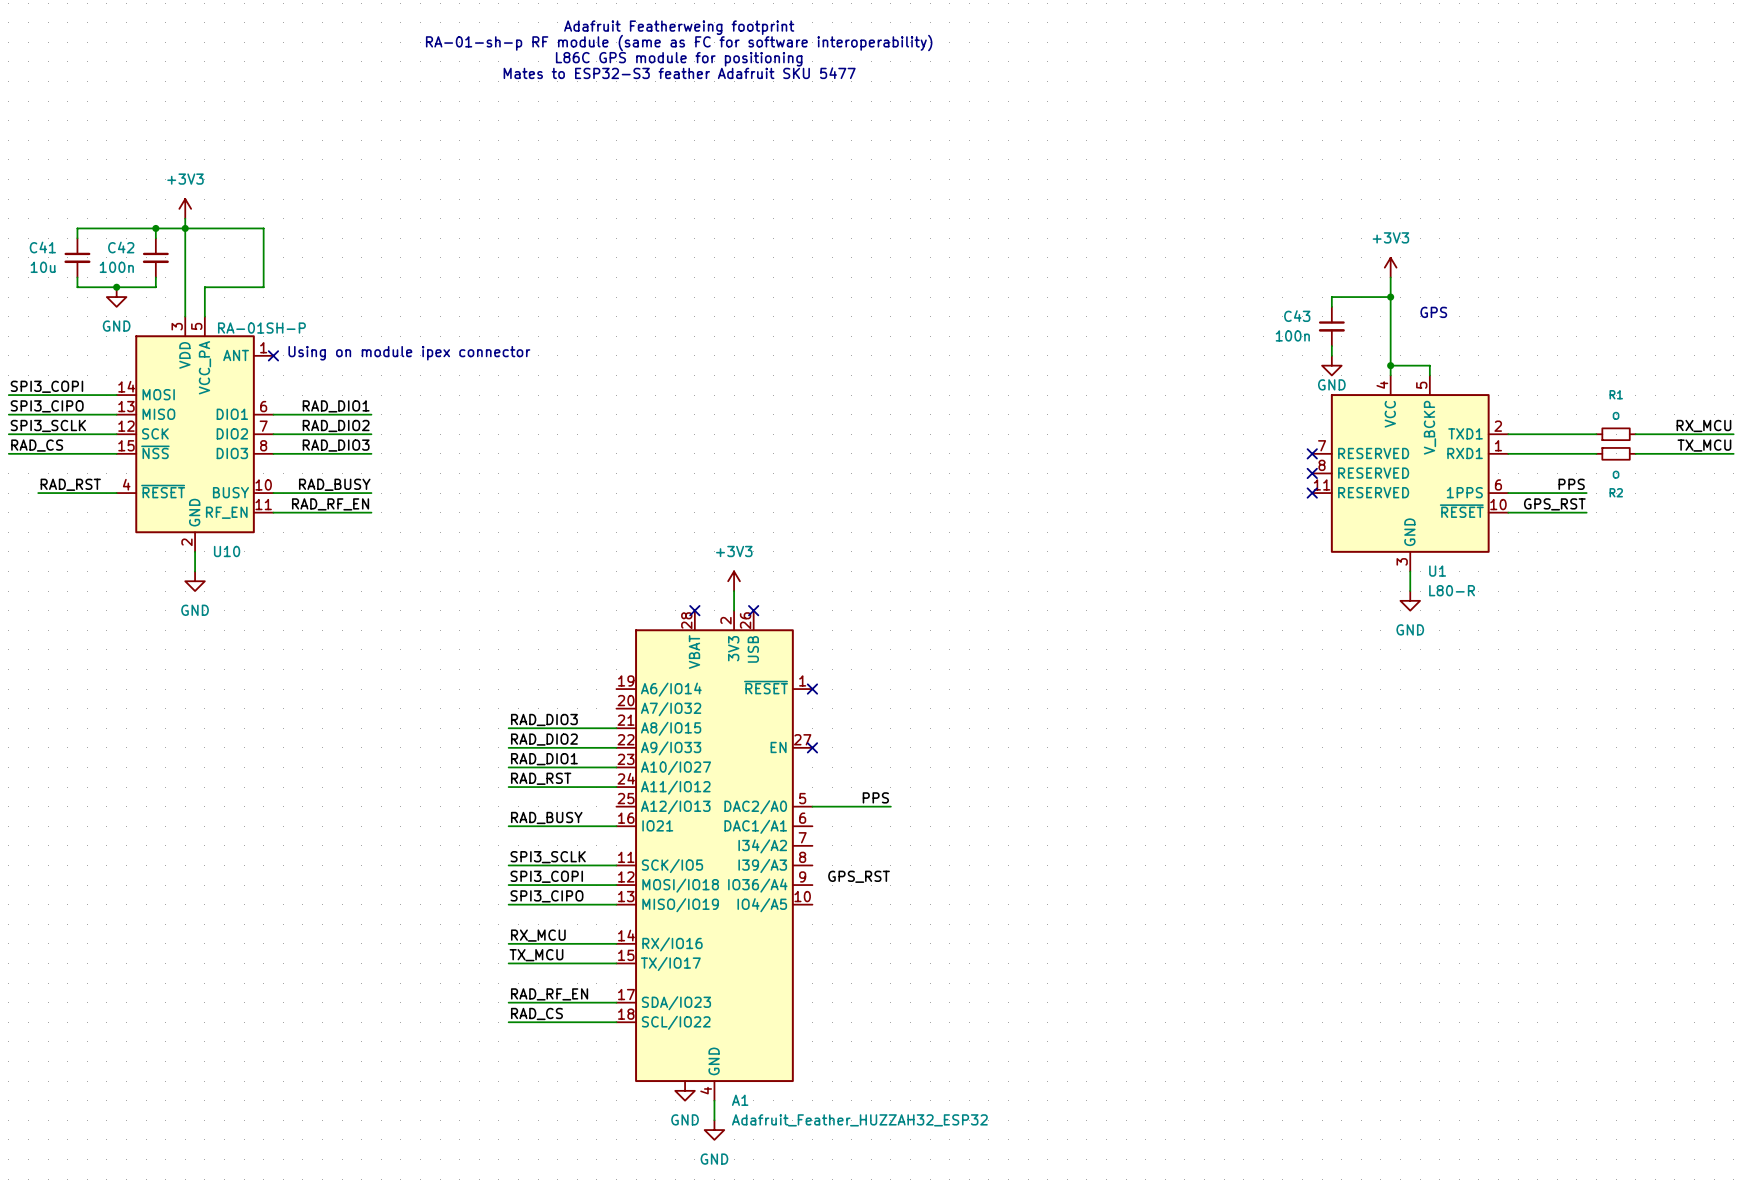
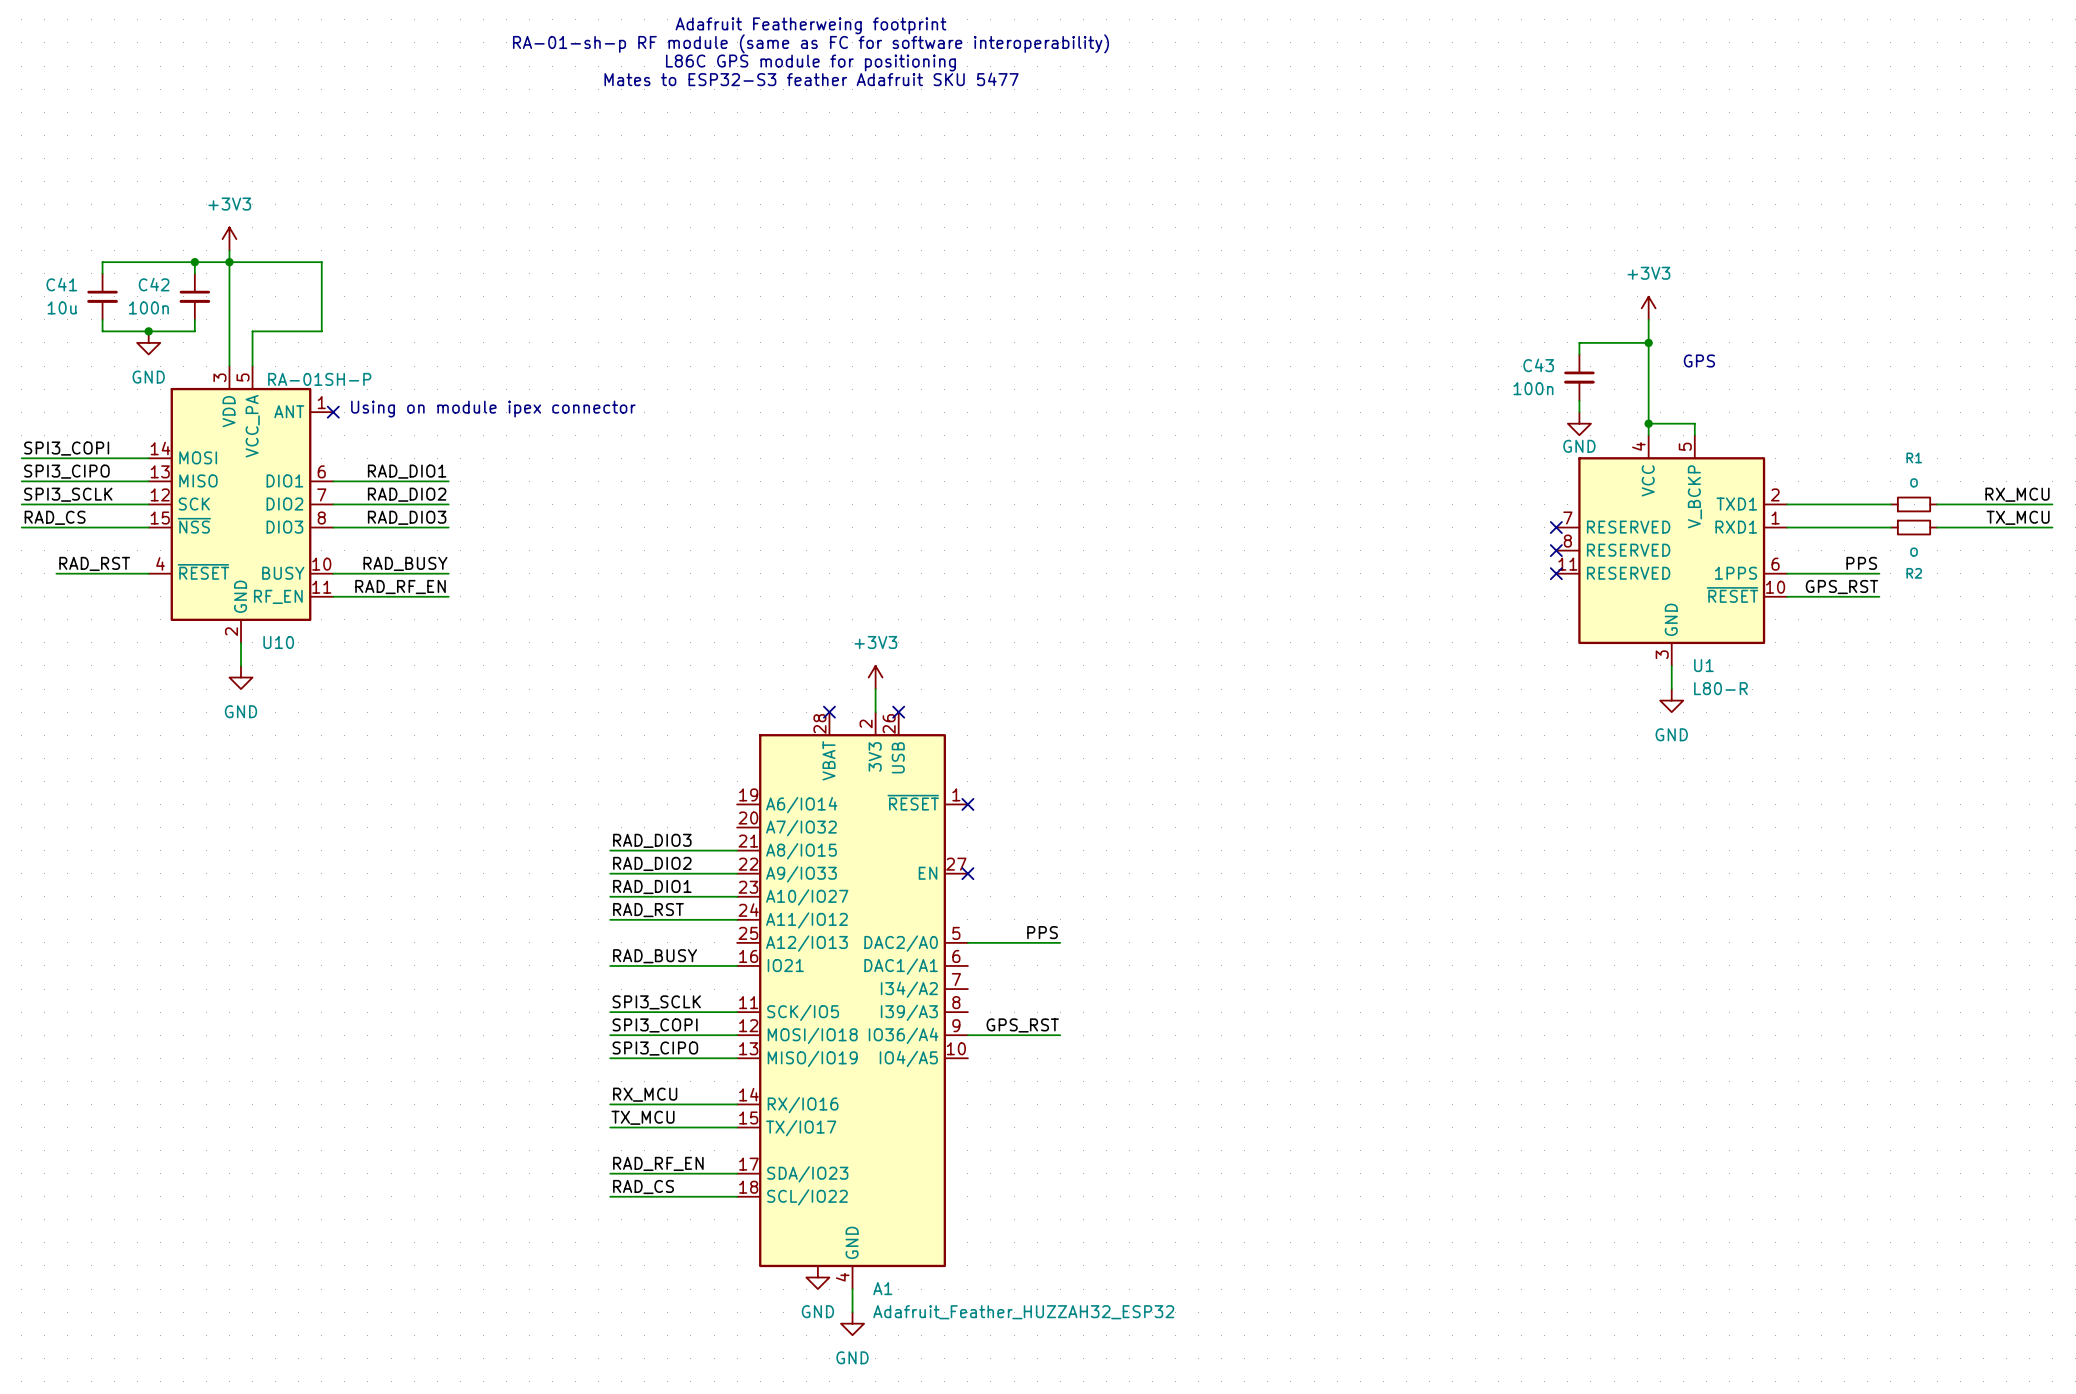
wire: none -> (967, 1035) (1060, 1035)

